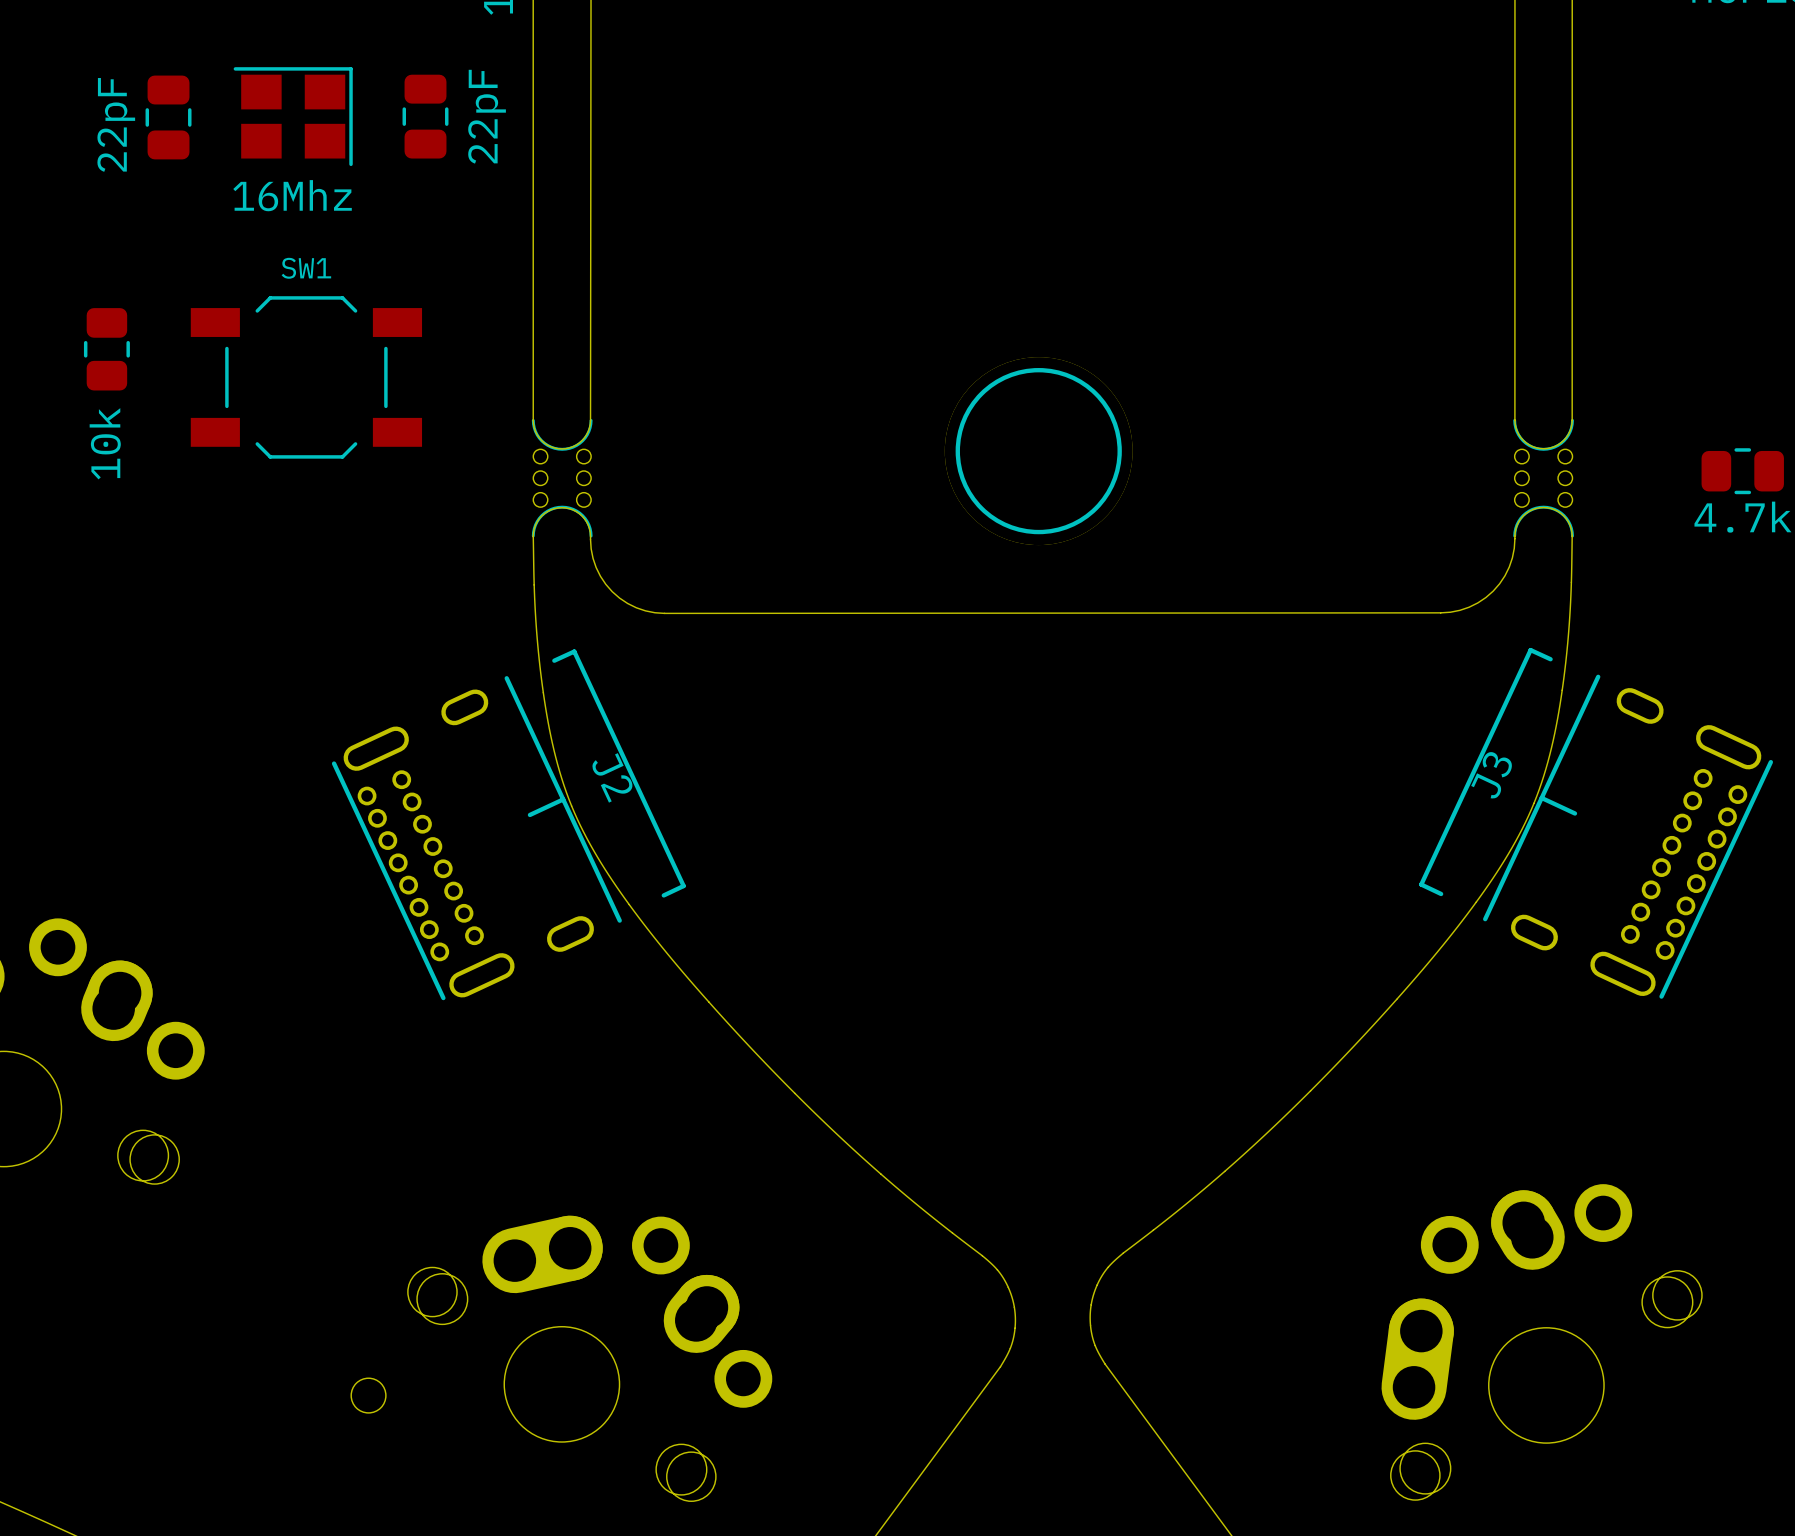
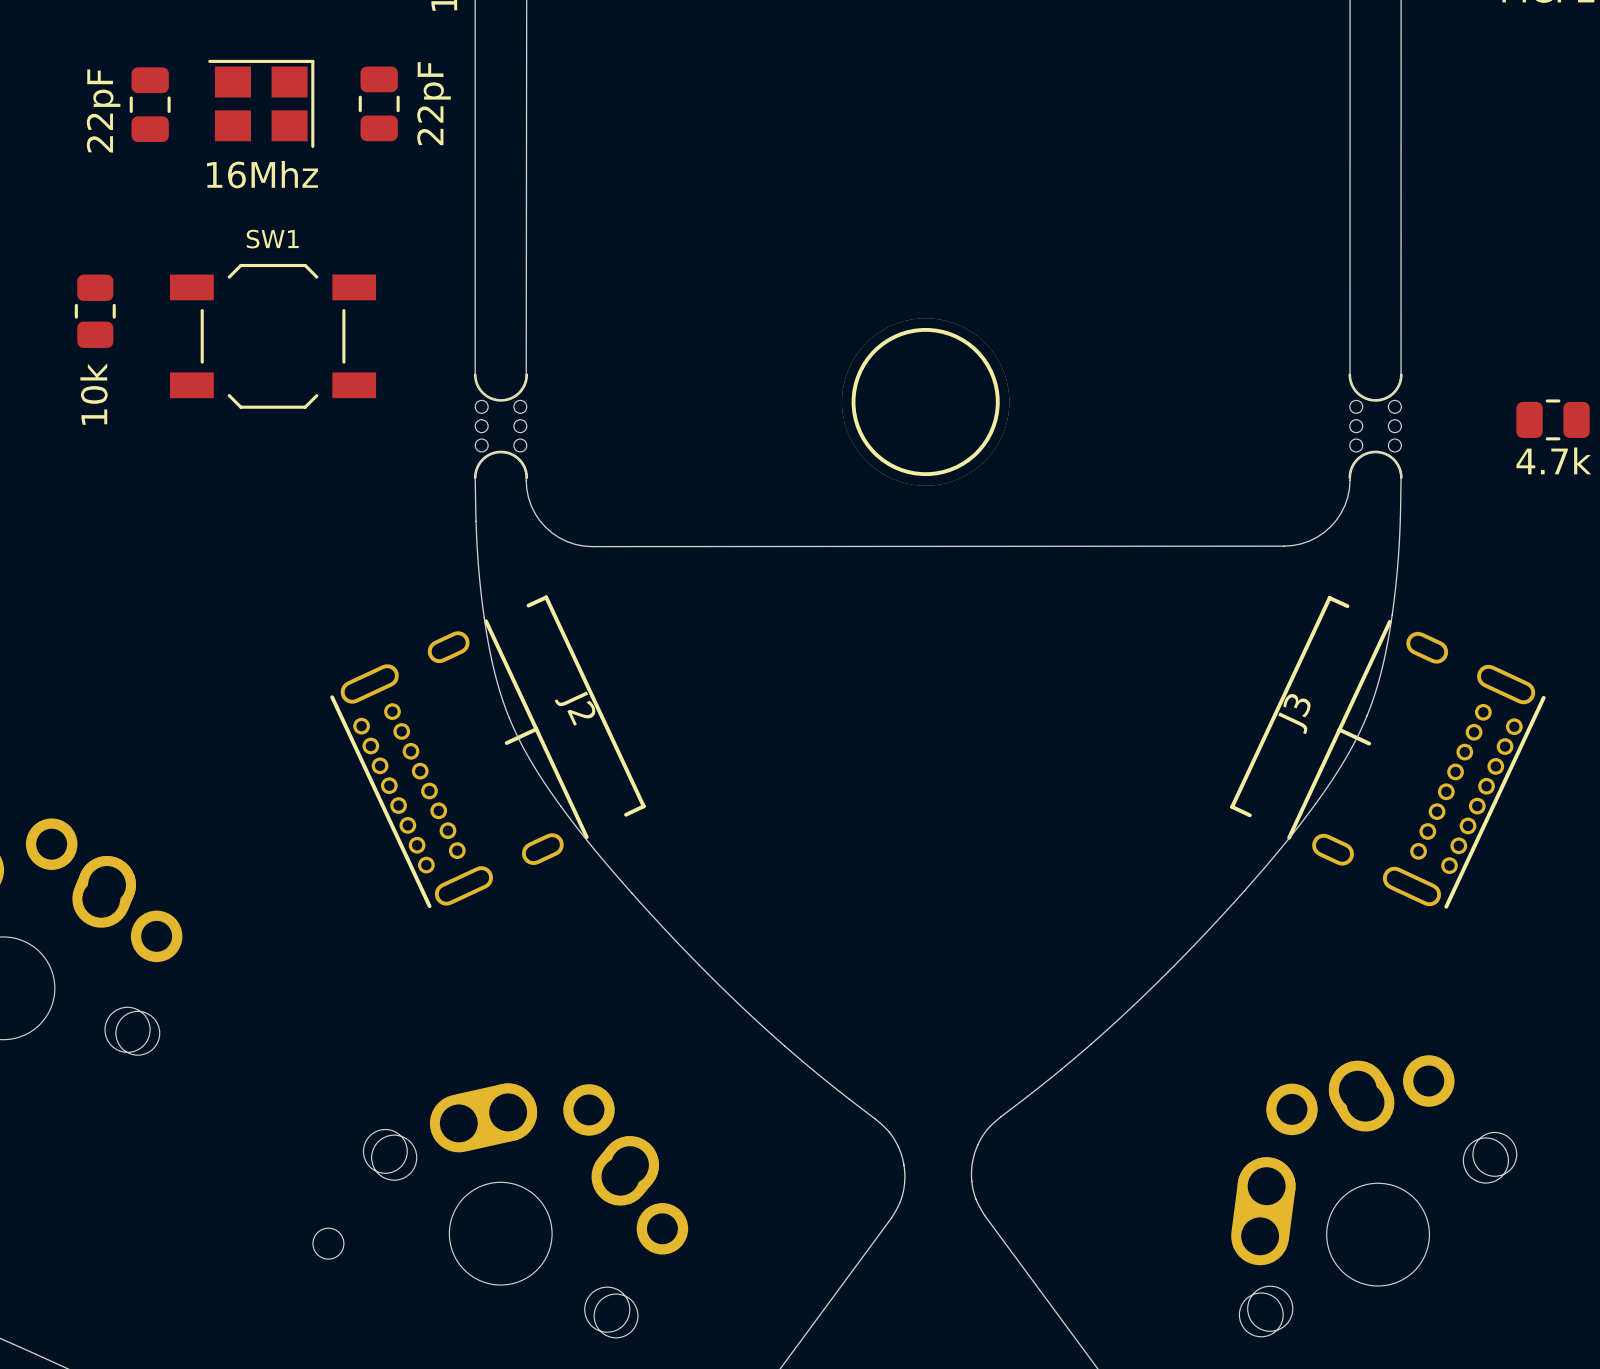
J3 position: (1596, 823) -> (1387, 752)
J2 position: (508, 824) -> (487, 751)

